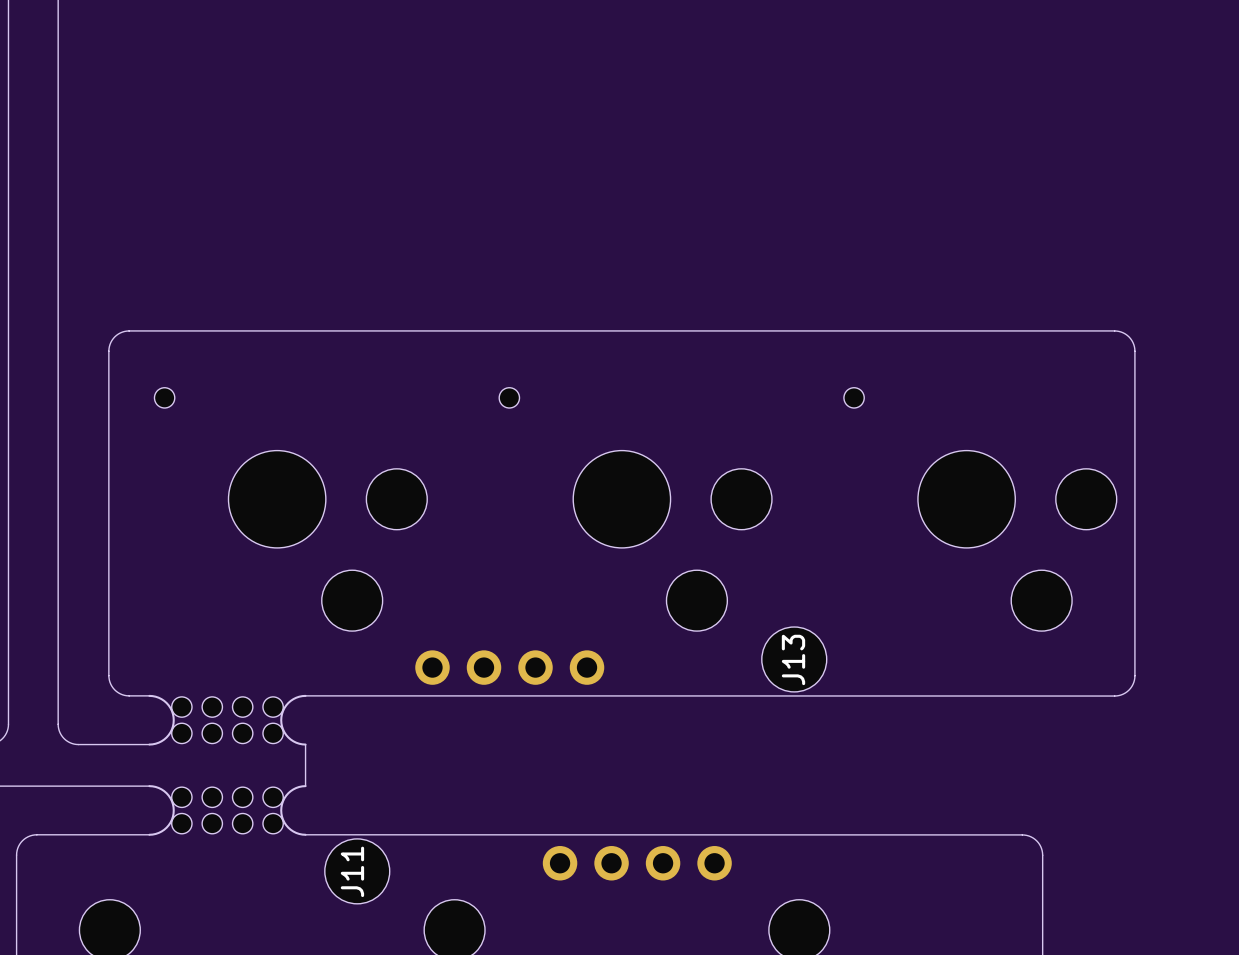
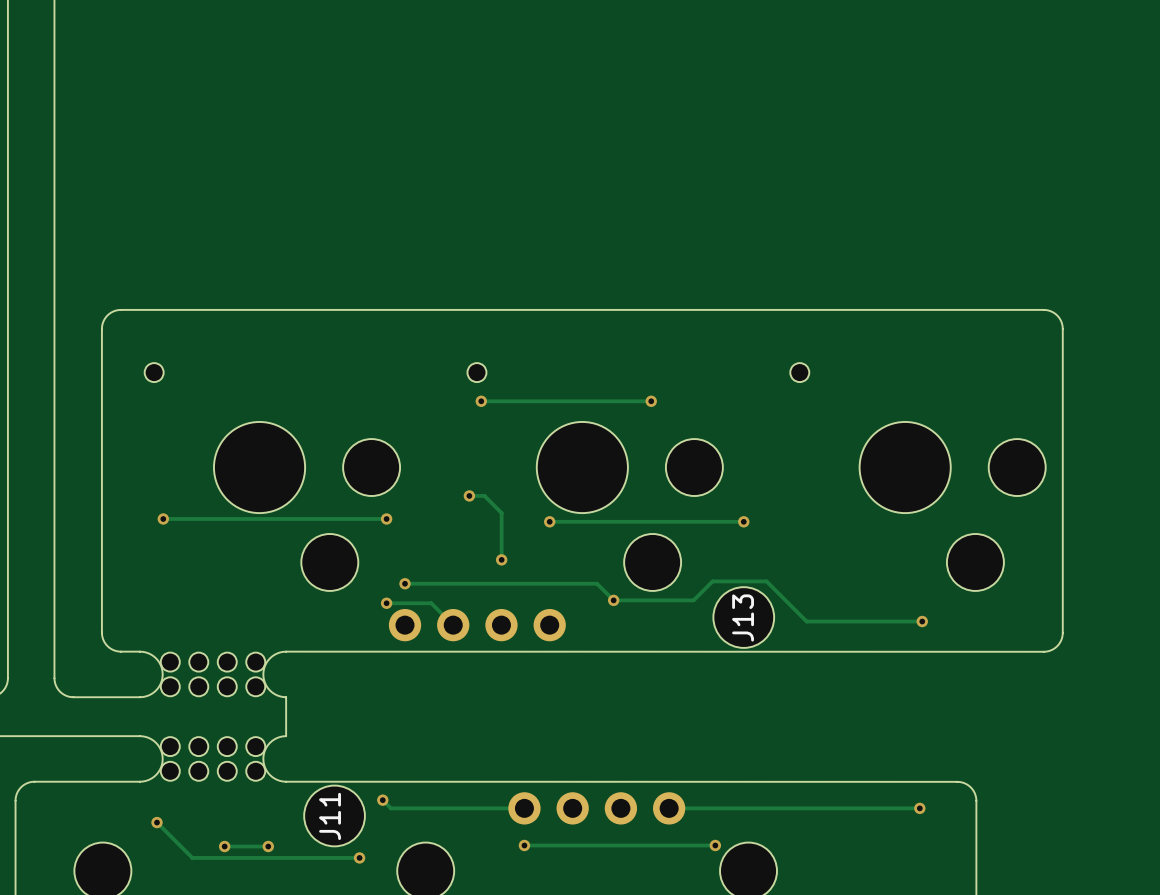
track: none -> (481, 401) (651, 401)
via: none -> (481, 401)
via: none -> (651, 401)
track: none -> (469, 495) (484, 495) (501, 513) (501, 559)
via: none -> (469, 495)
track: none -> (163, 518) (386, 518)
via: none -> (163, 518)
via: none -> (386, 518)
track: none -> (549, 521) (743, 521)
via: none -> (549, 521)
via: none -> (743, 521)
via: none -> (501, 559)
track: none -> (405, 583) (597, 583) (613, 600) (693, 600) (712, 581) (766, 581) (806, 621) (922, 621)
via: none -> (405, 583)
via: none -> (613, 600)
track: none -> (386, 603) (431, 603) (453, 625)
via: none -> (386, 603)
via: none -> (922, 621)
track: none -> (382, 800) (391, 808) (524, 808)
via: none -> (382, 800)
track: none -> (669, 808) (919, 808)
via: none -> (919, 808)
track: none -> (157, 822) (192, 857) (359, 857)
via: none -> (157, 822)
track: none -> (524, 845) (715, 845)
via: none -> (524, 845)
via: none -> (715, 845)
track: none -> (224, 846) (268, 846)
via: none -> (224, 846)
via: none -> (268, 846)
via: none -> (359, 857)

